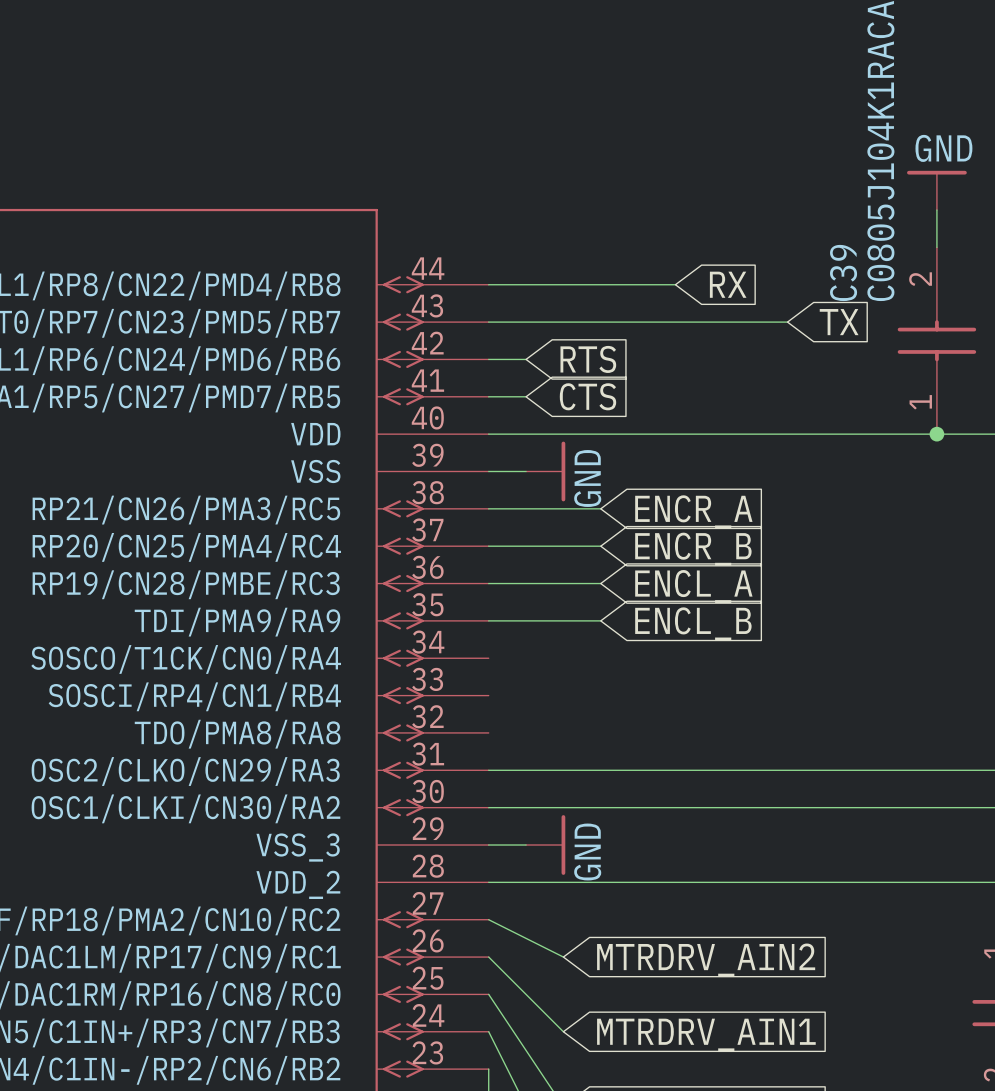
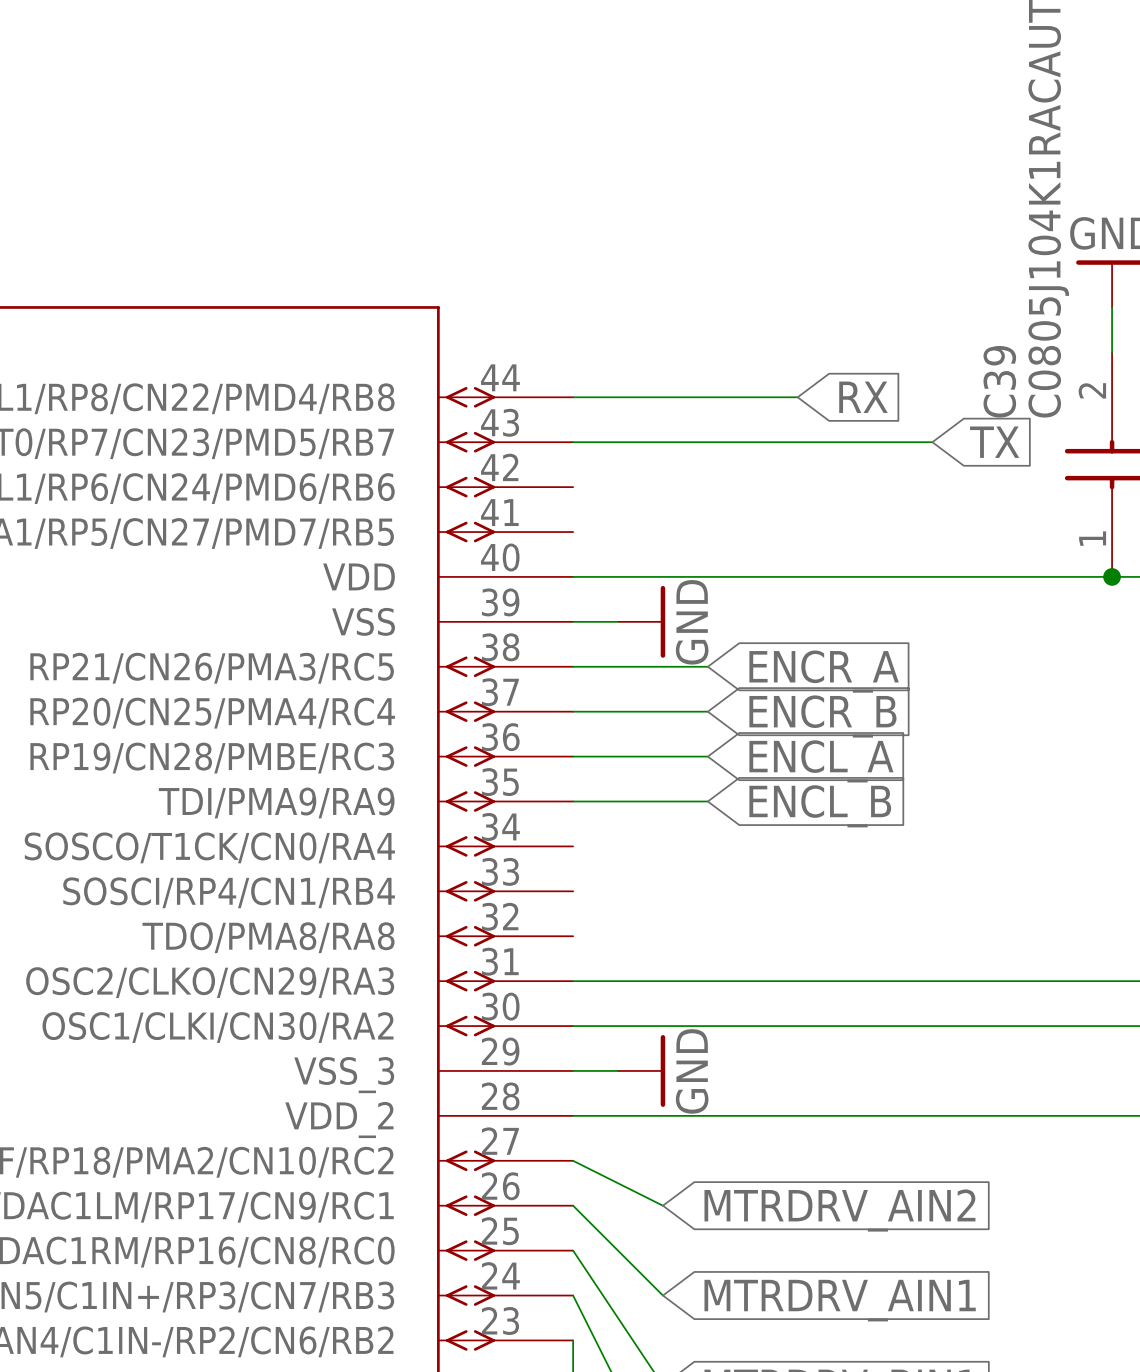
wire: (488, 359) (526, 359) -> none
global label: RTS (588, 359) -> none
wire: (488, 396) (526, 396) -> none
global label: CTS (587, 396) -> none

